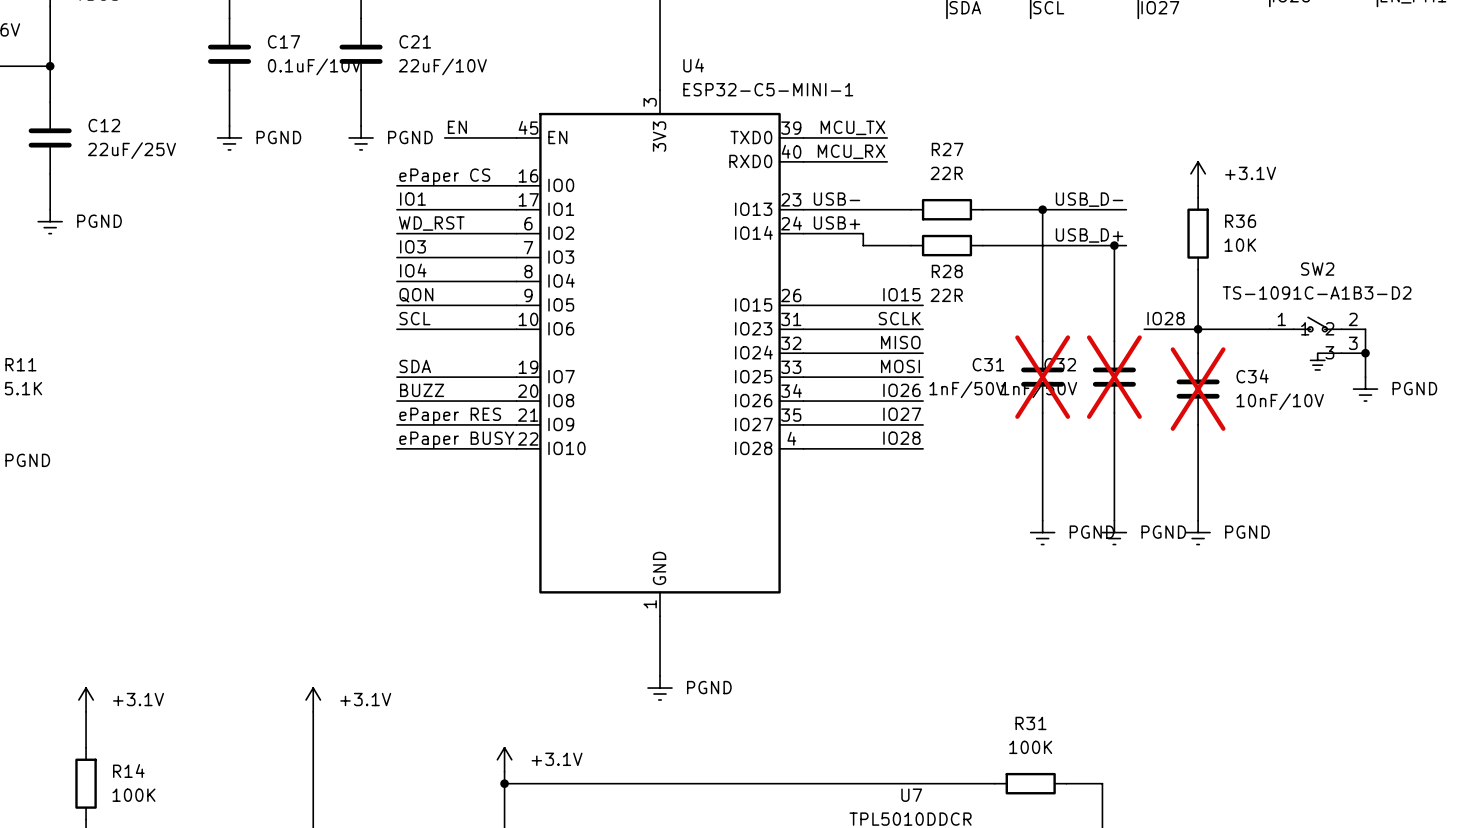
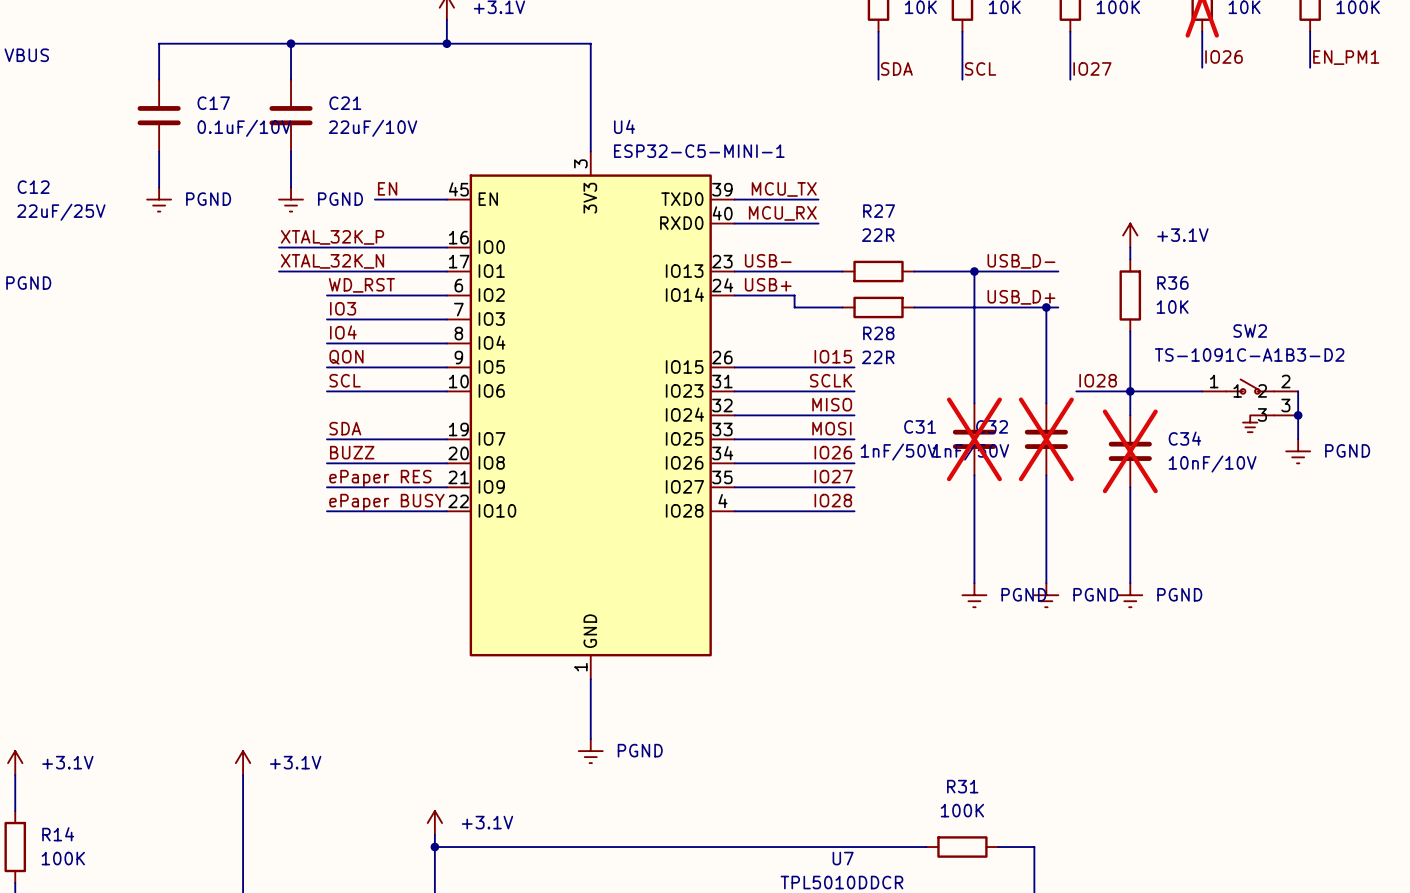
label: none -> XTAL_32K_P (332, 237)
label: ePaper CS (444, 177) -> none
wire: none -> (279, 247) (326, 247)
label: none -> XTAL_32K_N (332, 261)
label: IO1 (412, 199) -> none
wire: none -> (279, 271) (326, 271)

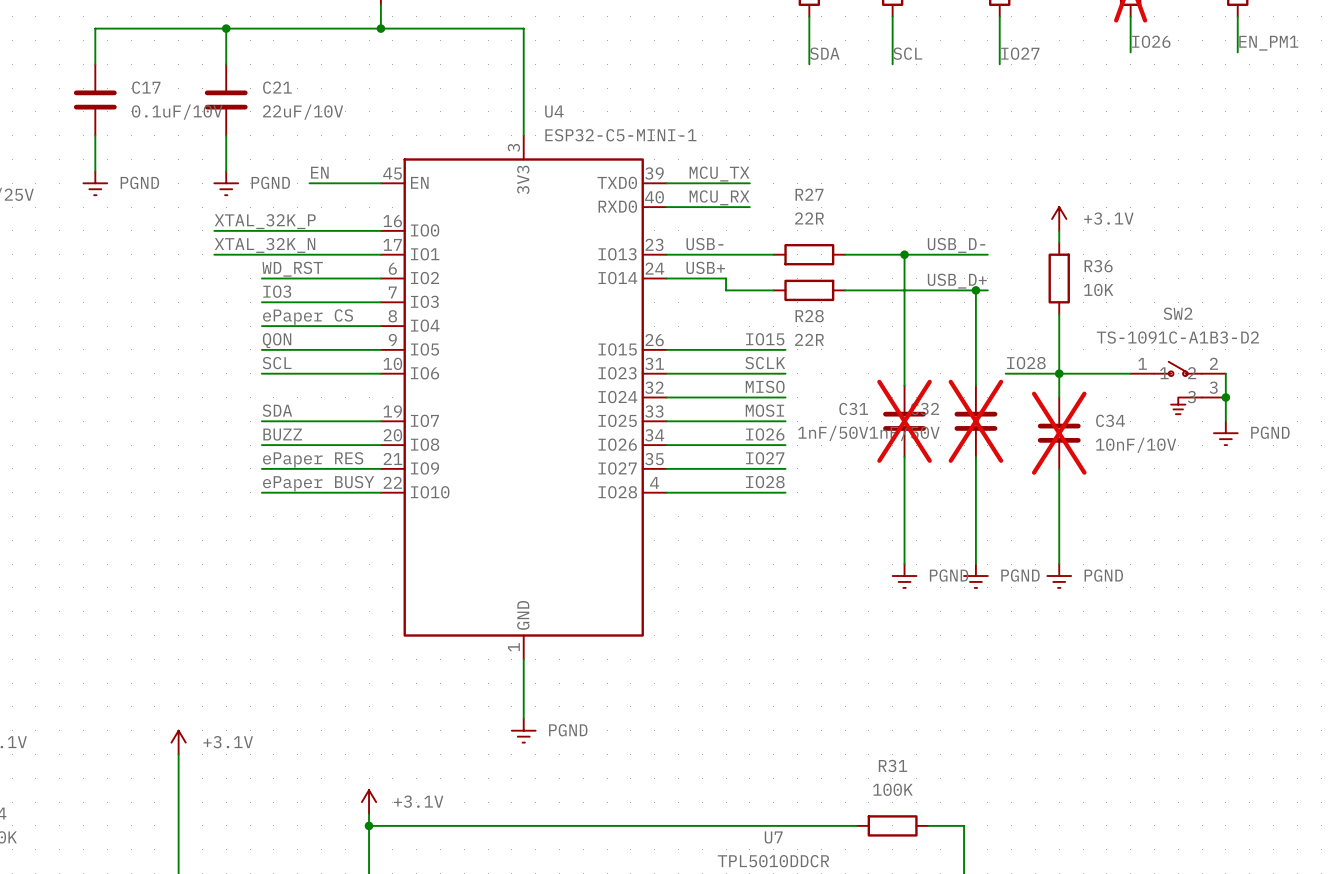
label: IO4 (343, 332) -> ePaper CS (308, 317)

